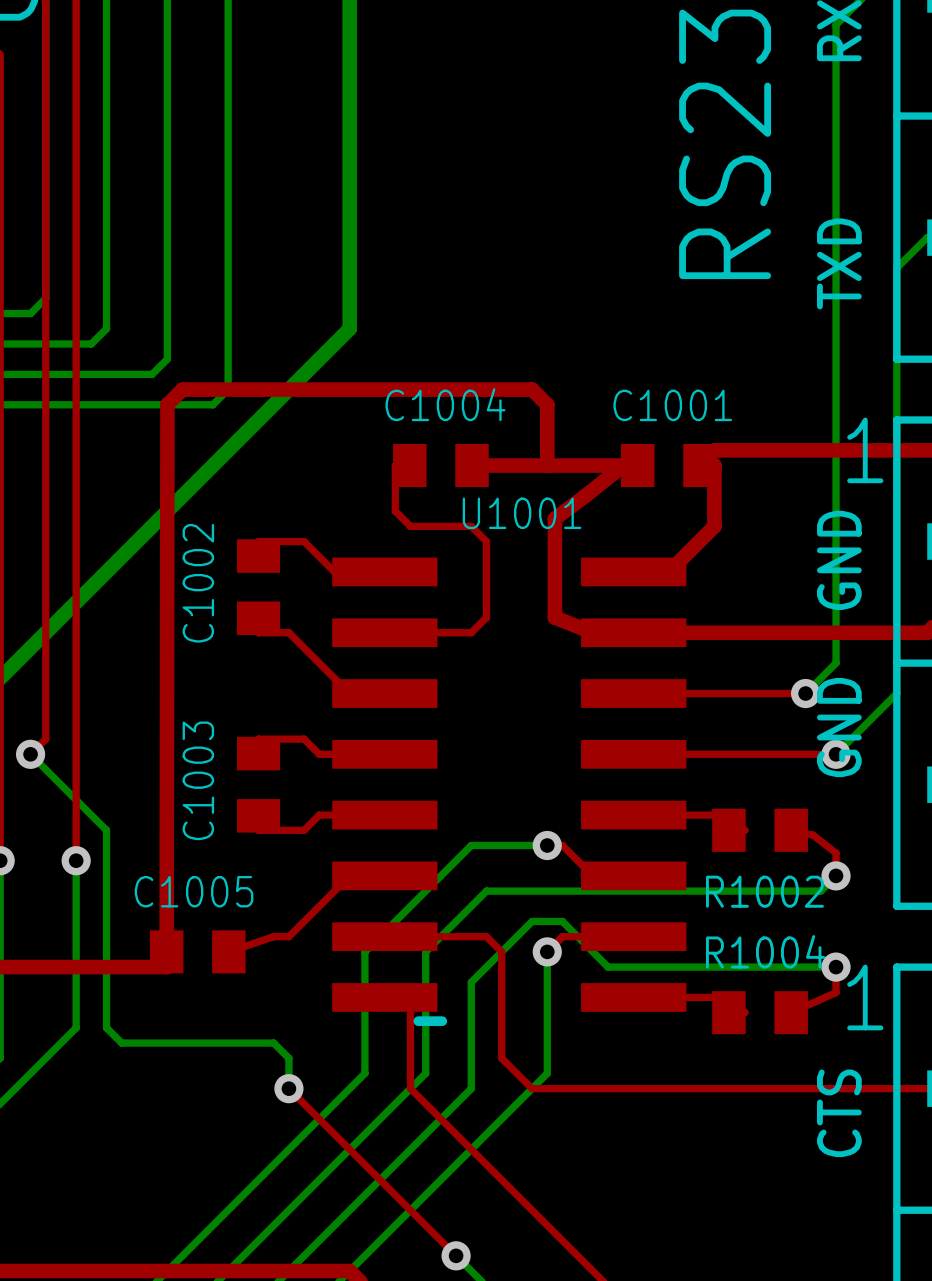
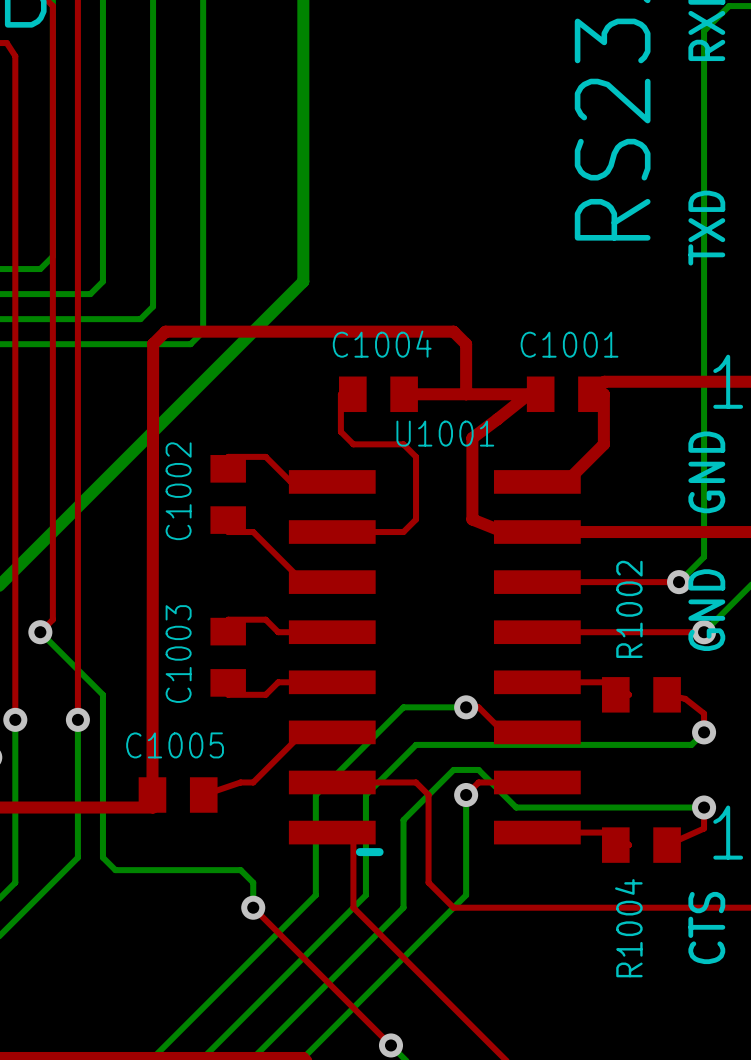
R1002 name rotation: 0° (764, 891) -> 90° counterclockwise (629, 609)
R1002 name position: R1002 (764, 891) -> R1002 (629, 609)
R1004 name rotation: 0° (765, 951) -> 90° counterclockwise (628, 928)
R1004 name position: R1004 (765, 951) -> R1004 (628, 928)

